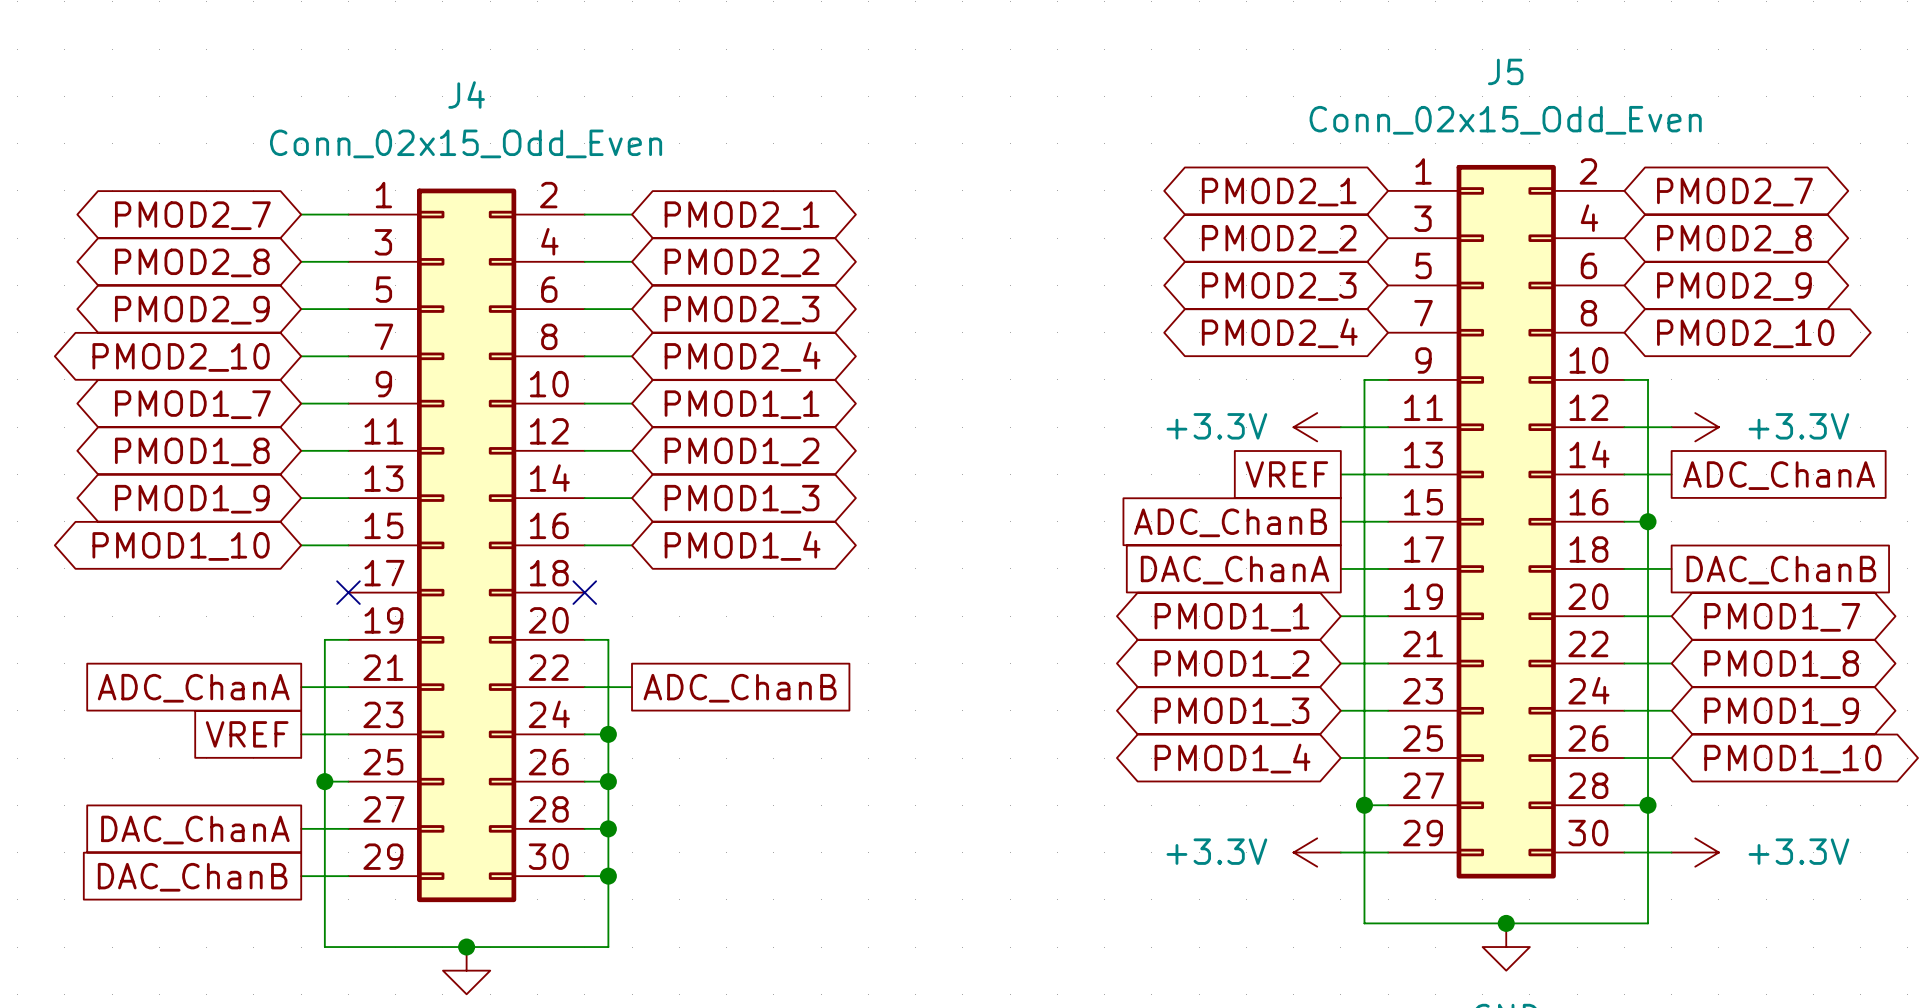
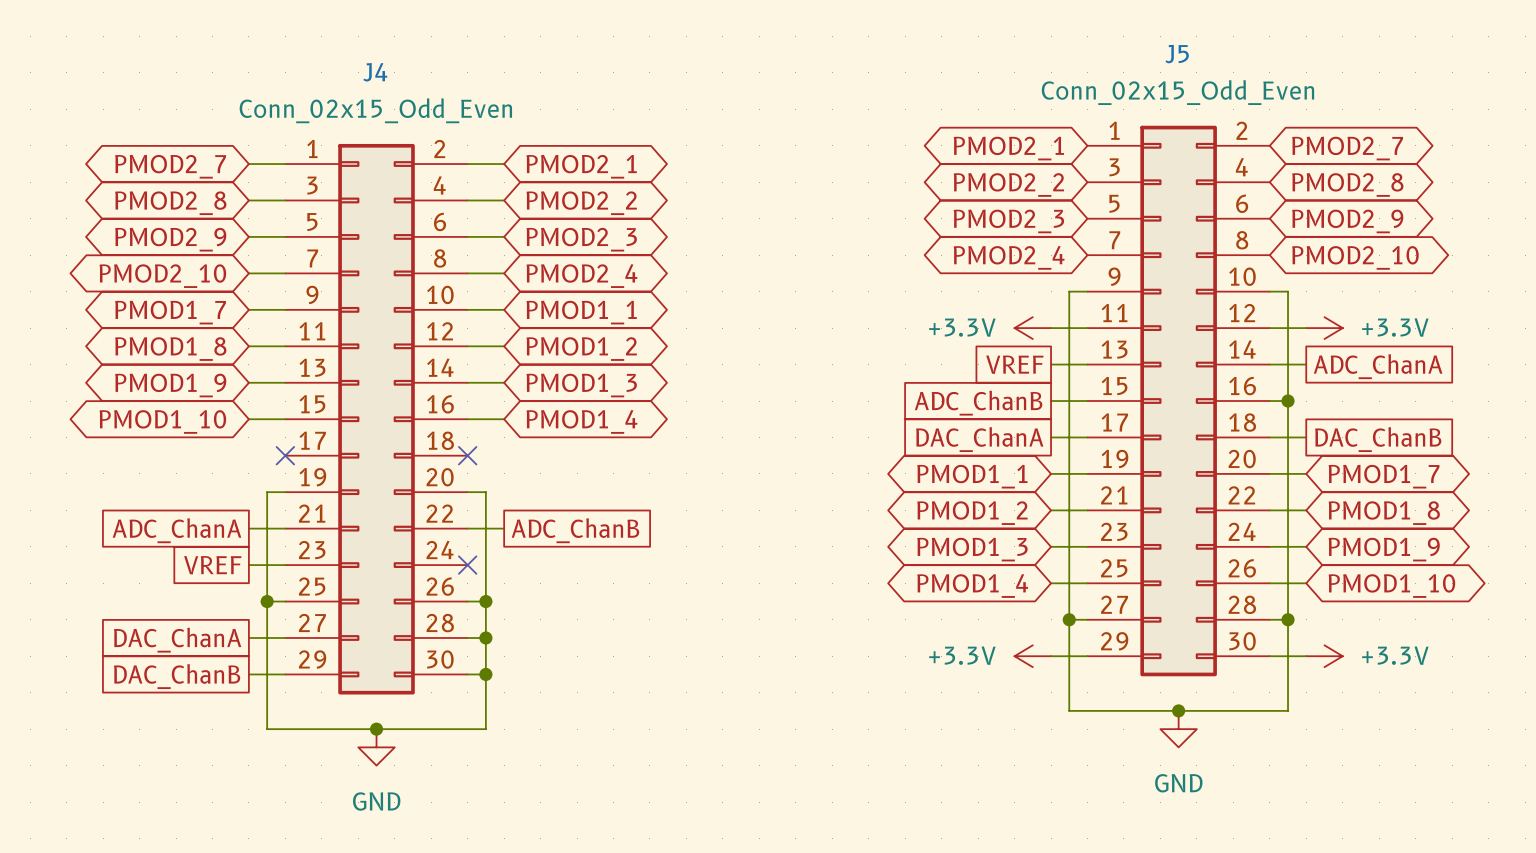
wire: (584, 734) (608, 734) -> none
no-connect mark: none -> (467, 565)
junction: (608, 734) -> none

